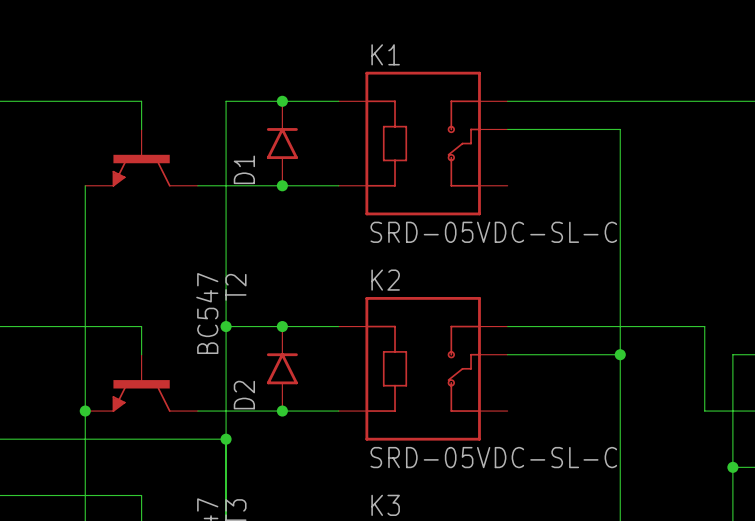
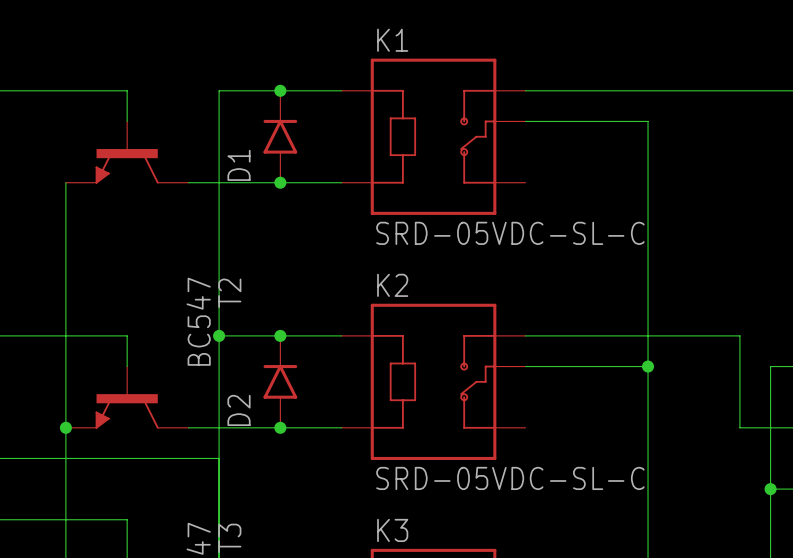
junction: (226, 439) -> none

